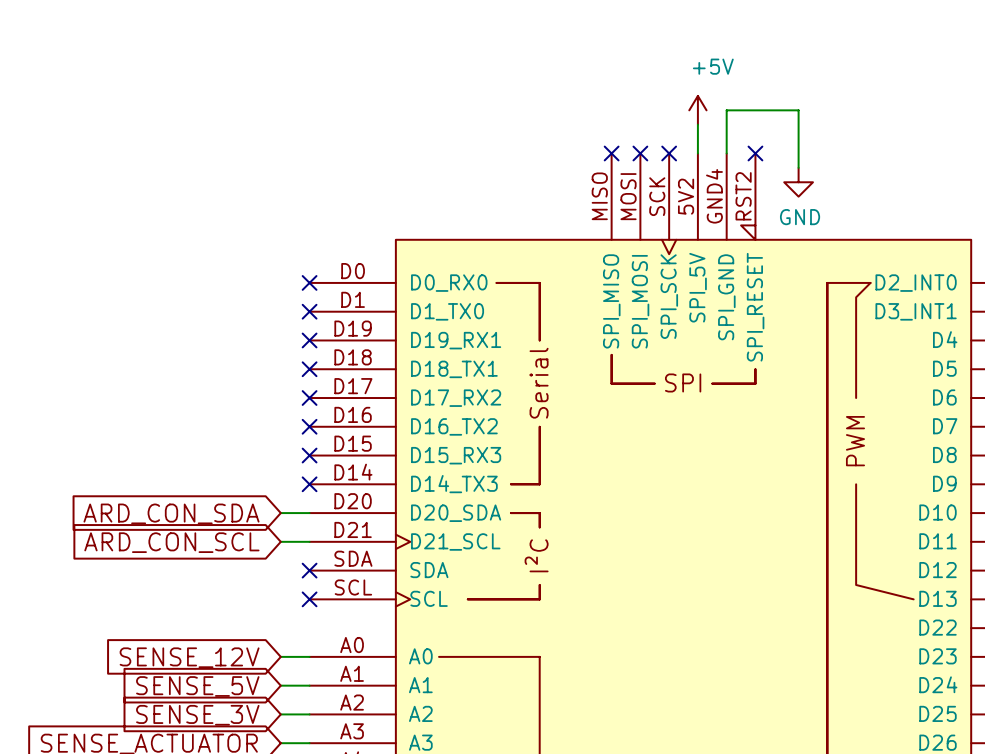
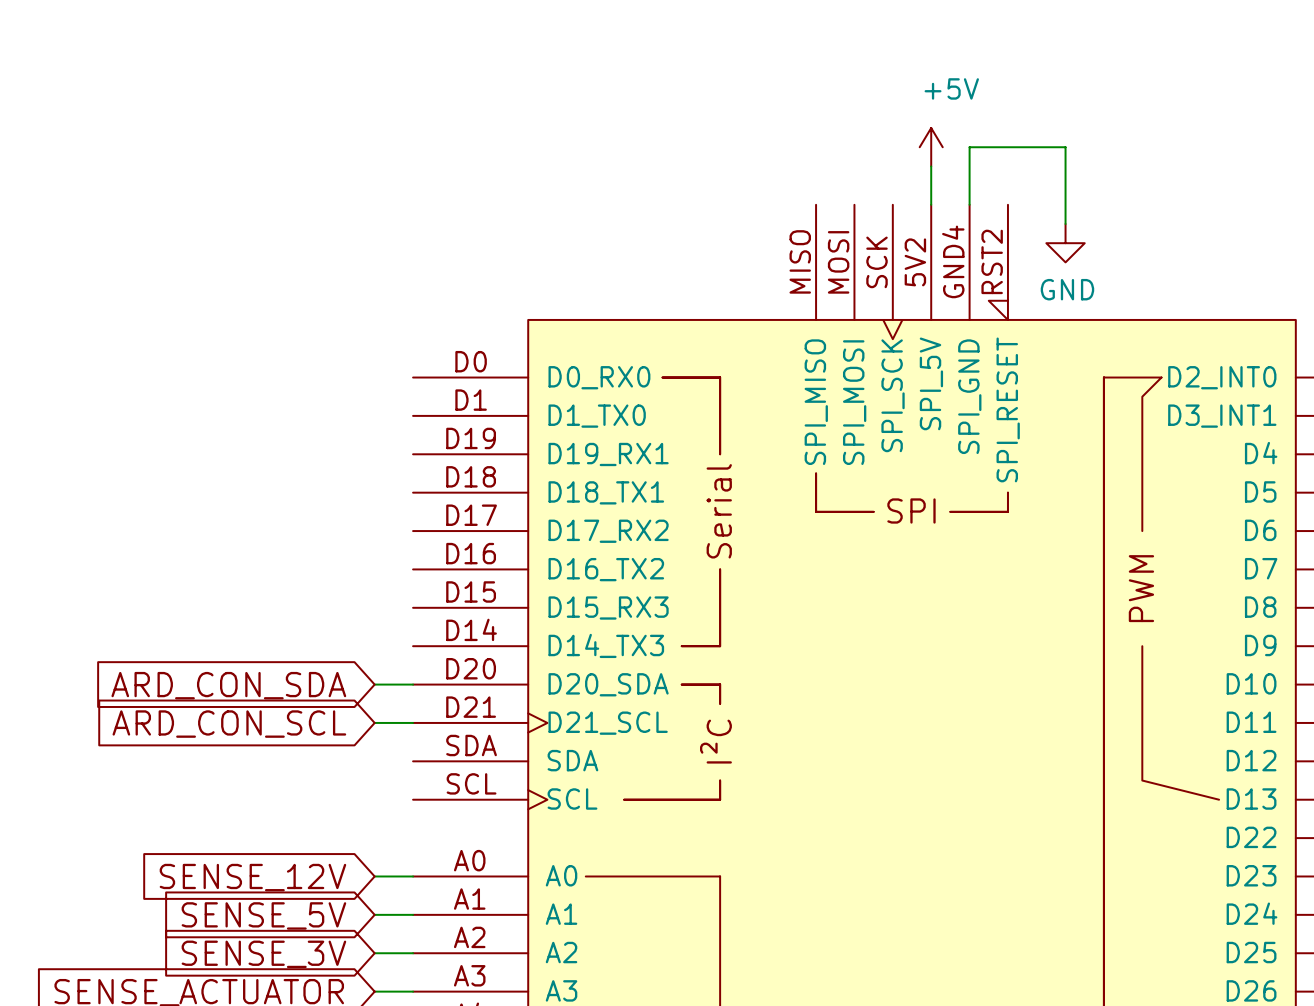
no-connect mark: (611, 153) -> none
no-connect mark: (640, 153) -> none
no-connect mark: (669, 153) -> none
no-connect mark: (755, 153) -> none
no-connect mark: (309, 282) -> none
no-connect mark: (309, 311) -> none
no-connect mark: (309, 340) -> none
no-connect mark: (309, 369) -> none
no-connect mark: (309, 398) -> none
no-connect mark: (309, 426) -> none
no-connect mark: (309, 455) -> none
no-connect mark: (309, 484) -> none
no-connect mark: (309, 570) -> none
no-connect mark: (309, 599) -> none

